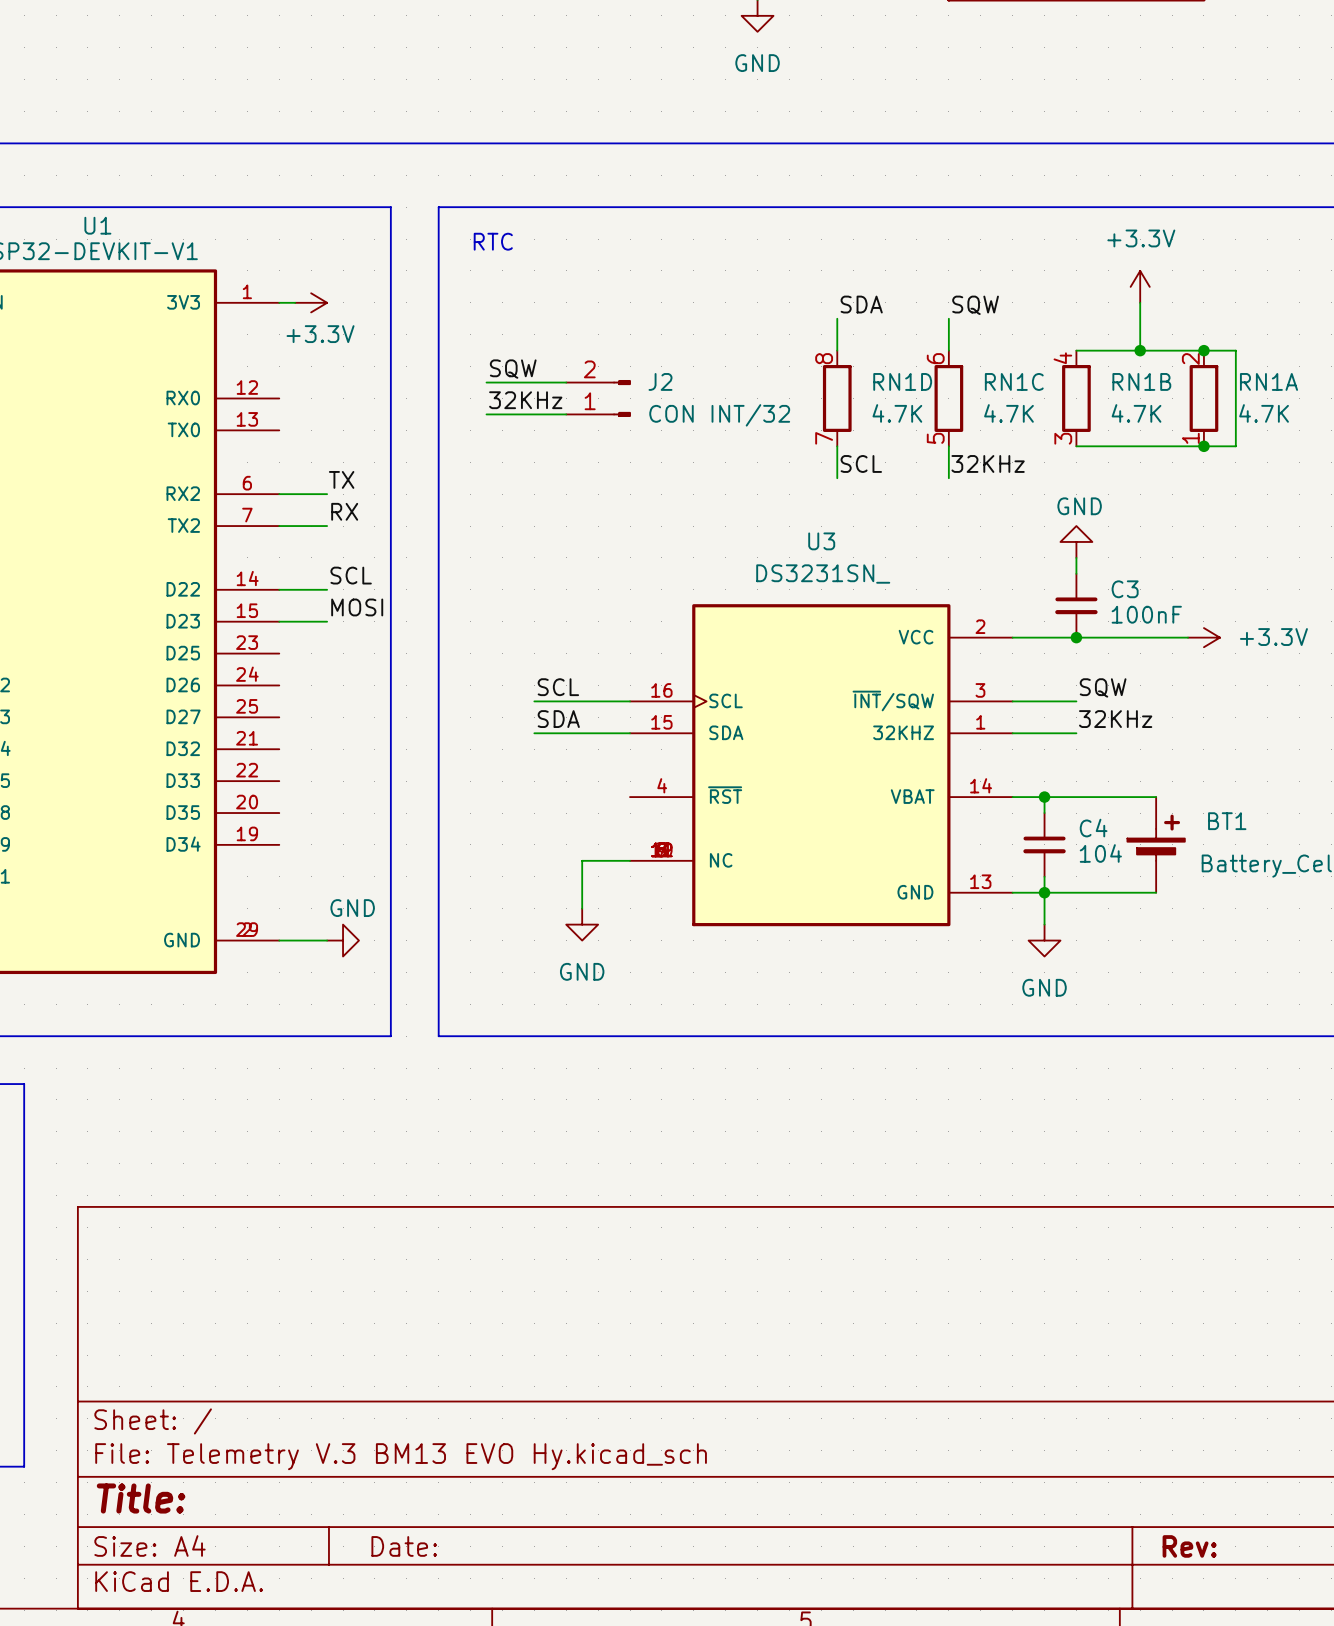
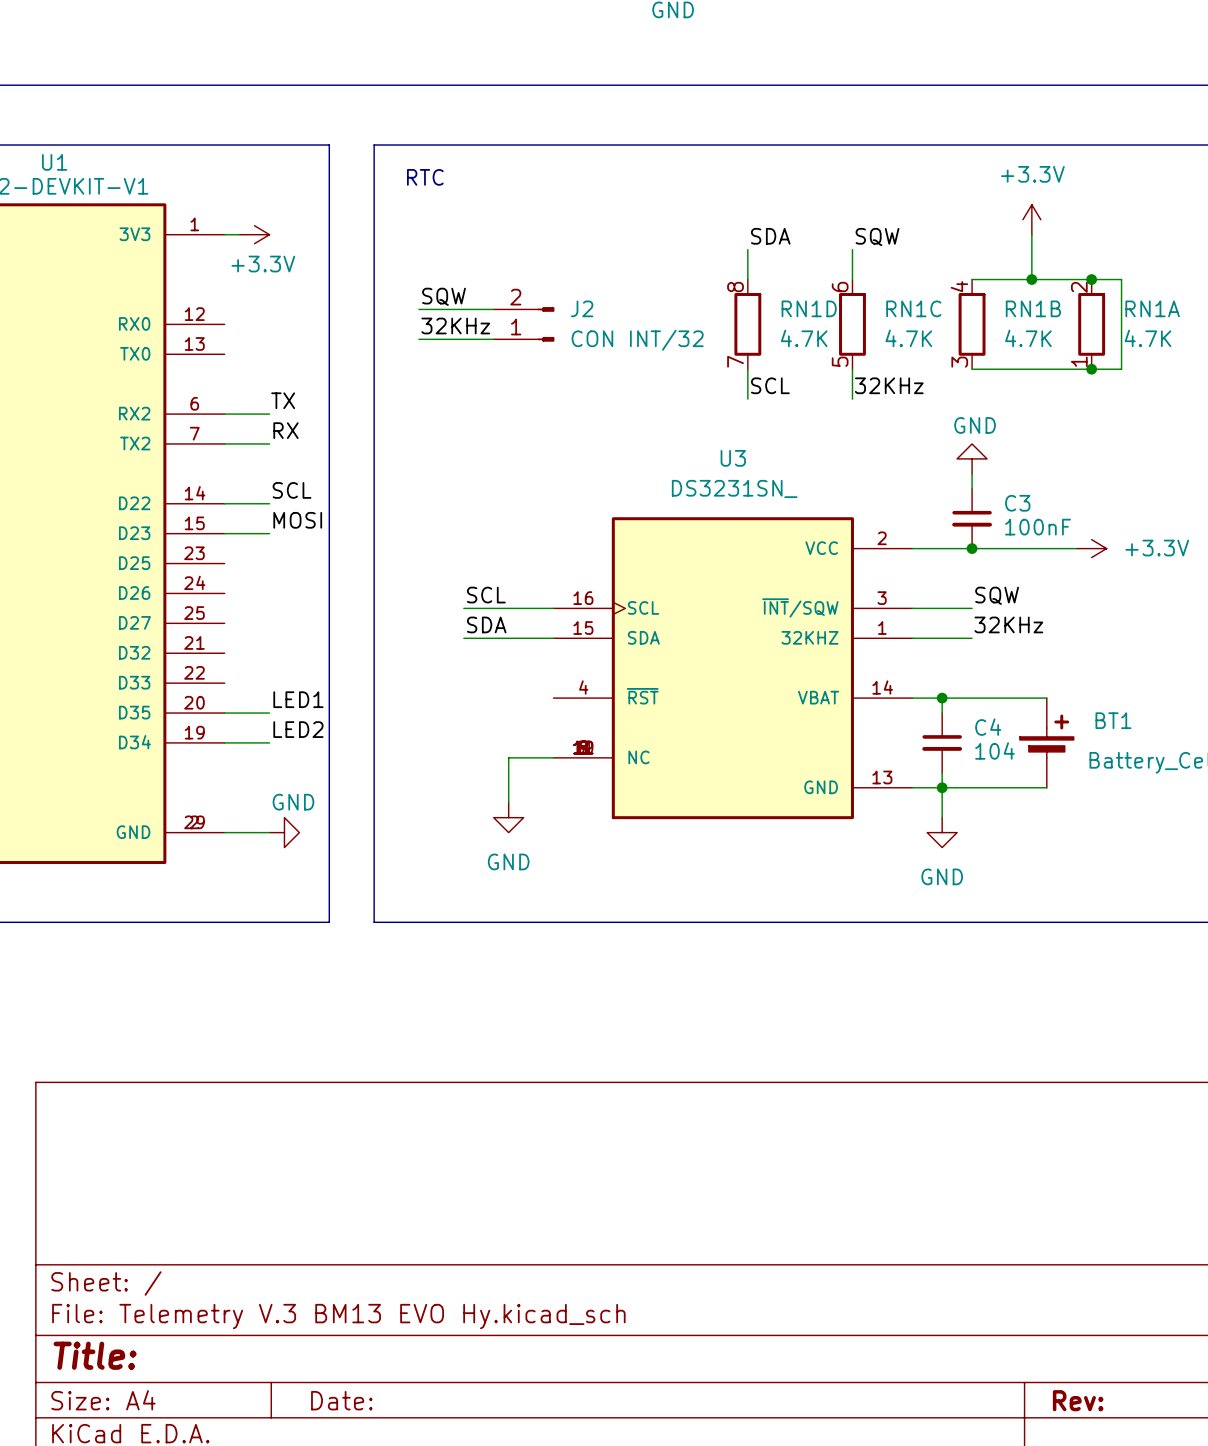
label: none -> LED1 (298, 699)
wire: none -> (224, 713) (269, 713)
label: none -> LED2 (298, 729)
wire: none -> (224, 742) (269, 742)

